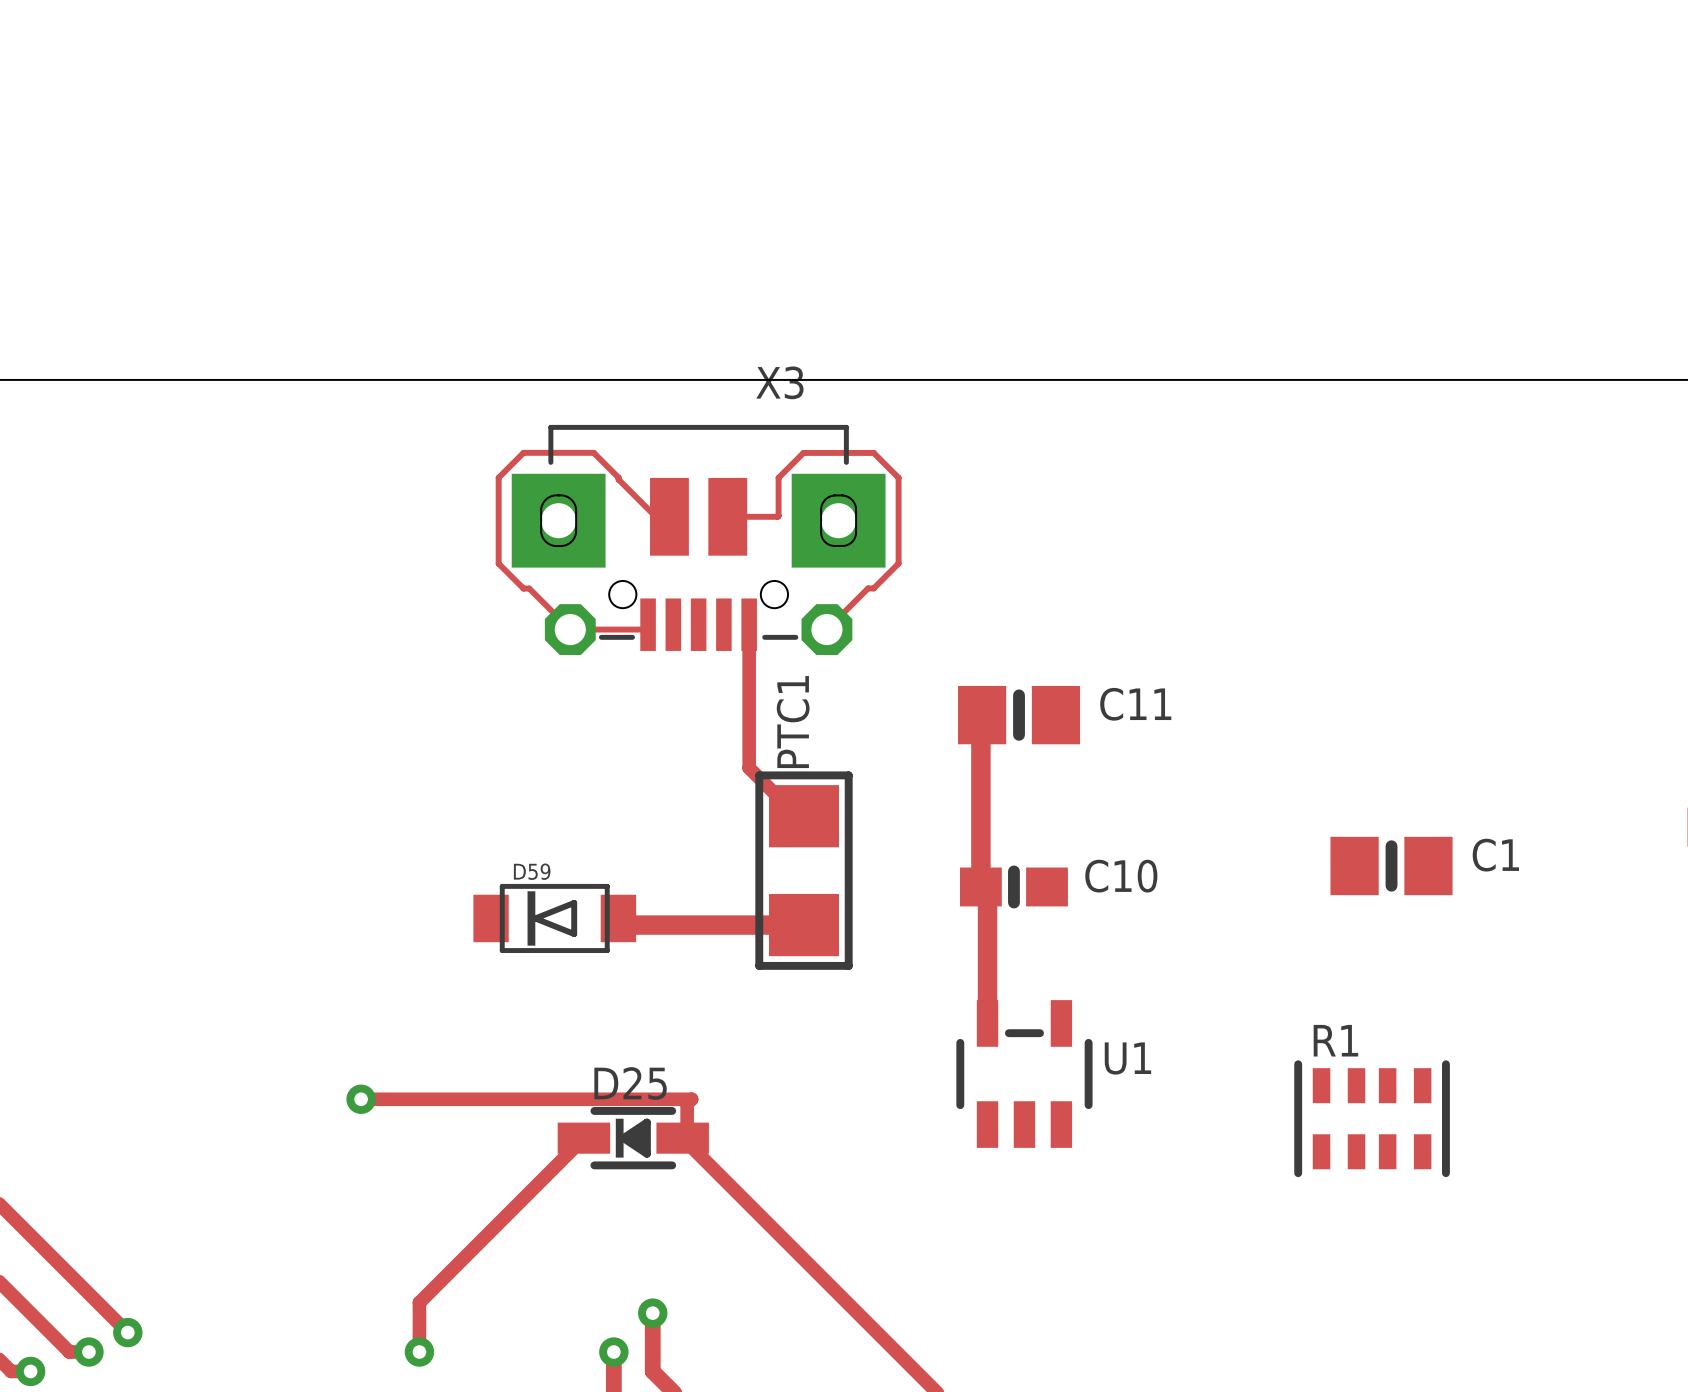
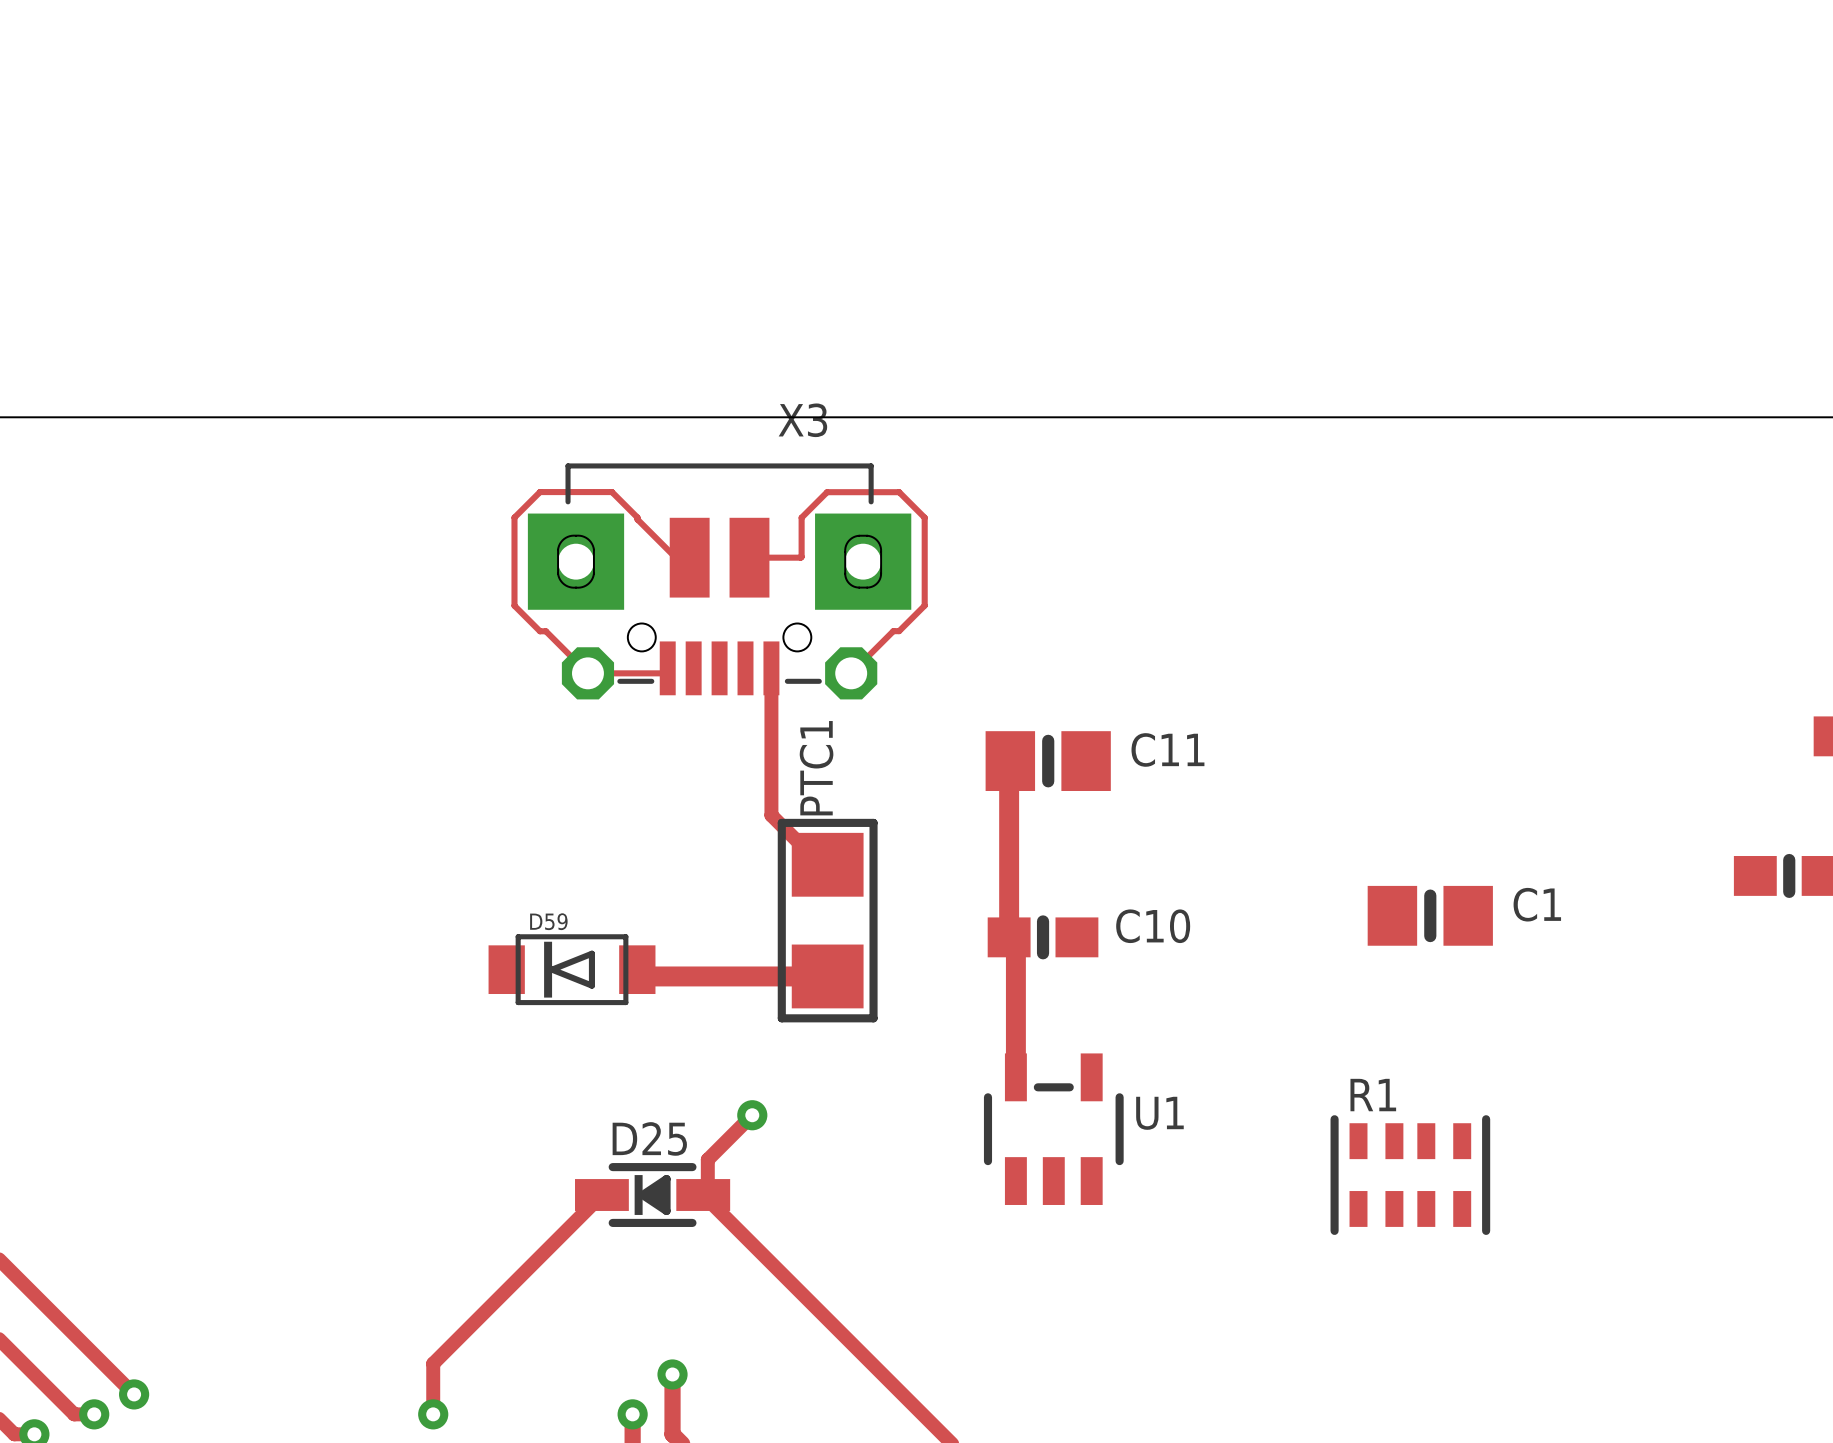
via: none -> (752, 1115)
track: (361, 1099) (691, 1099) -> (752, 1115) (712, 1155)
via: (361, 1099) -> none

